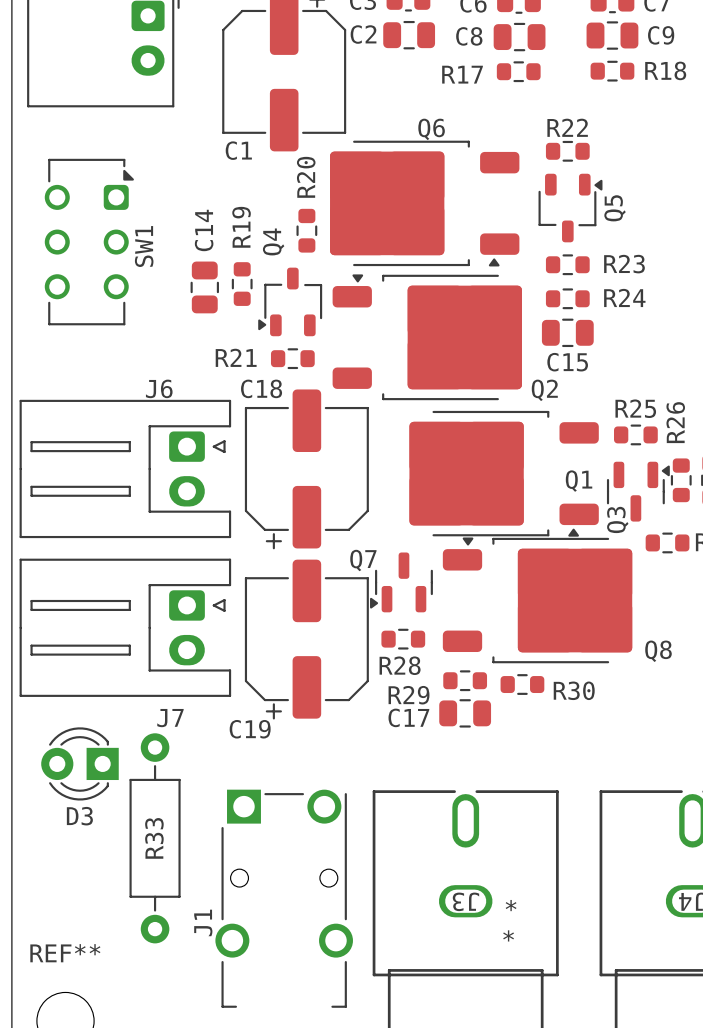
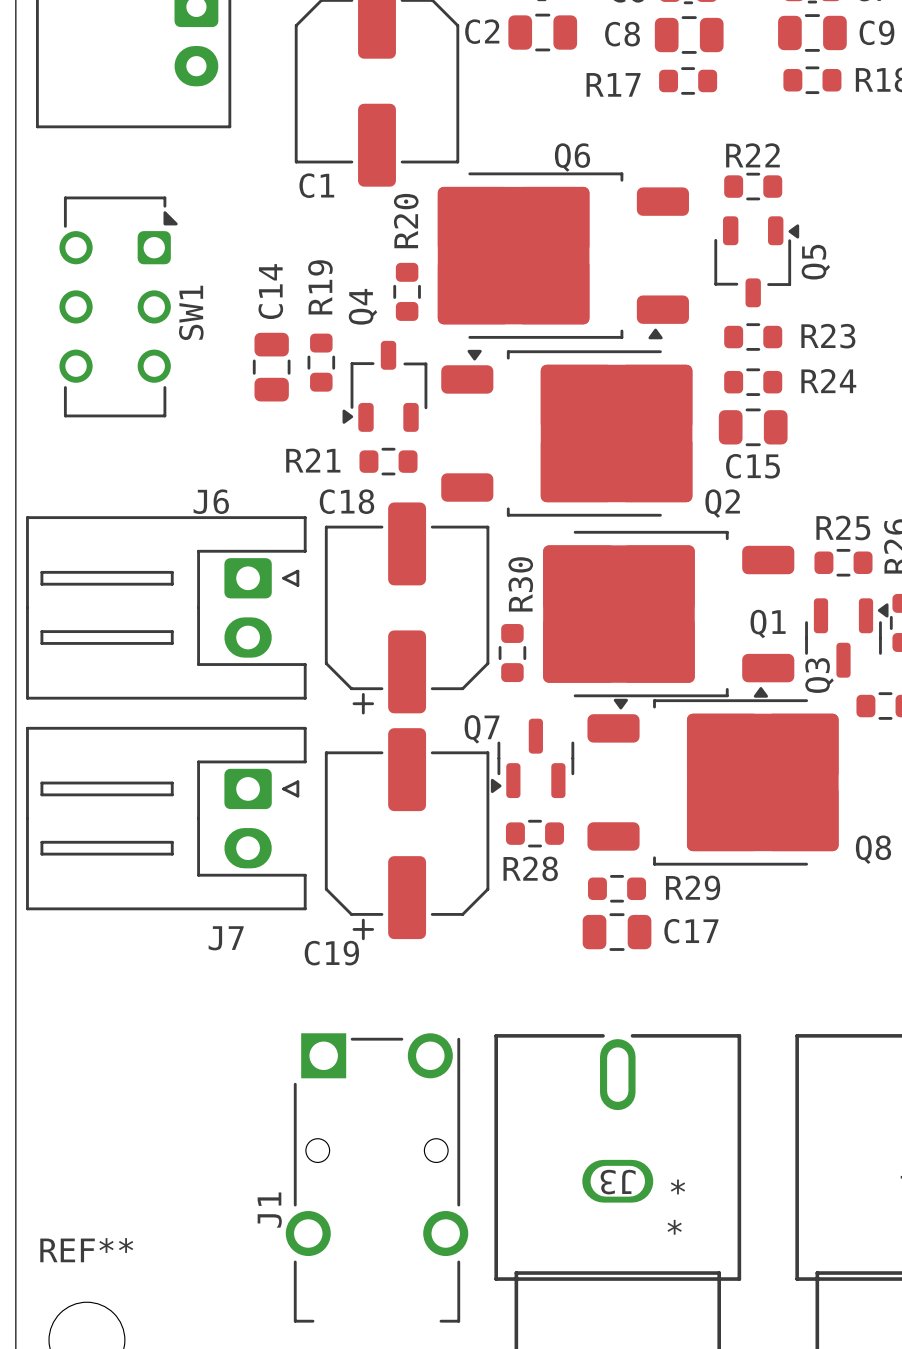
R30 rotation: 0° (522, 684) -> 90° clockwise (512, 653)
R30 position: (522, 684) -> (512, 653)
R30 name position: R30 (574, 690) -> R30 (520, 584)
R29 name position: R29 (409, 695) -> R29 (693, 887)
C17 name position: C17 (408, 717) -> C17 (691, 931)
D3: (79, 763) -> none
R33: (155, 838) -> none

